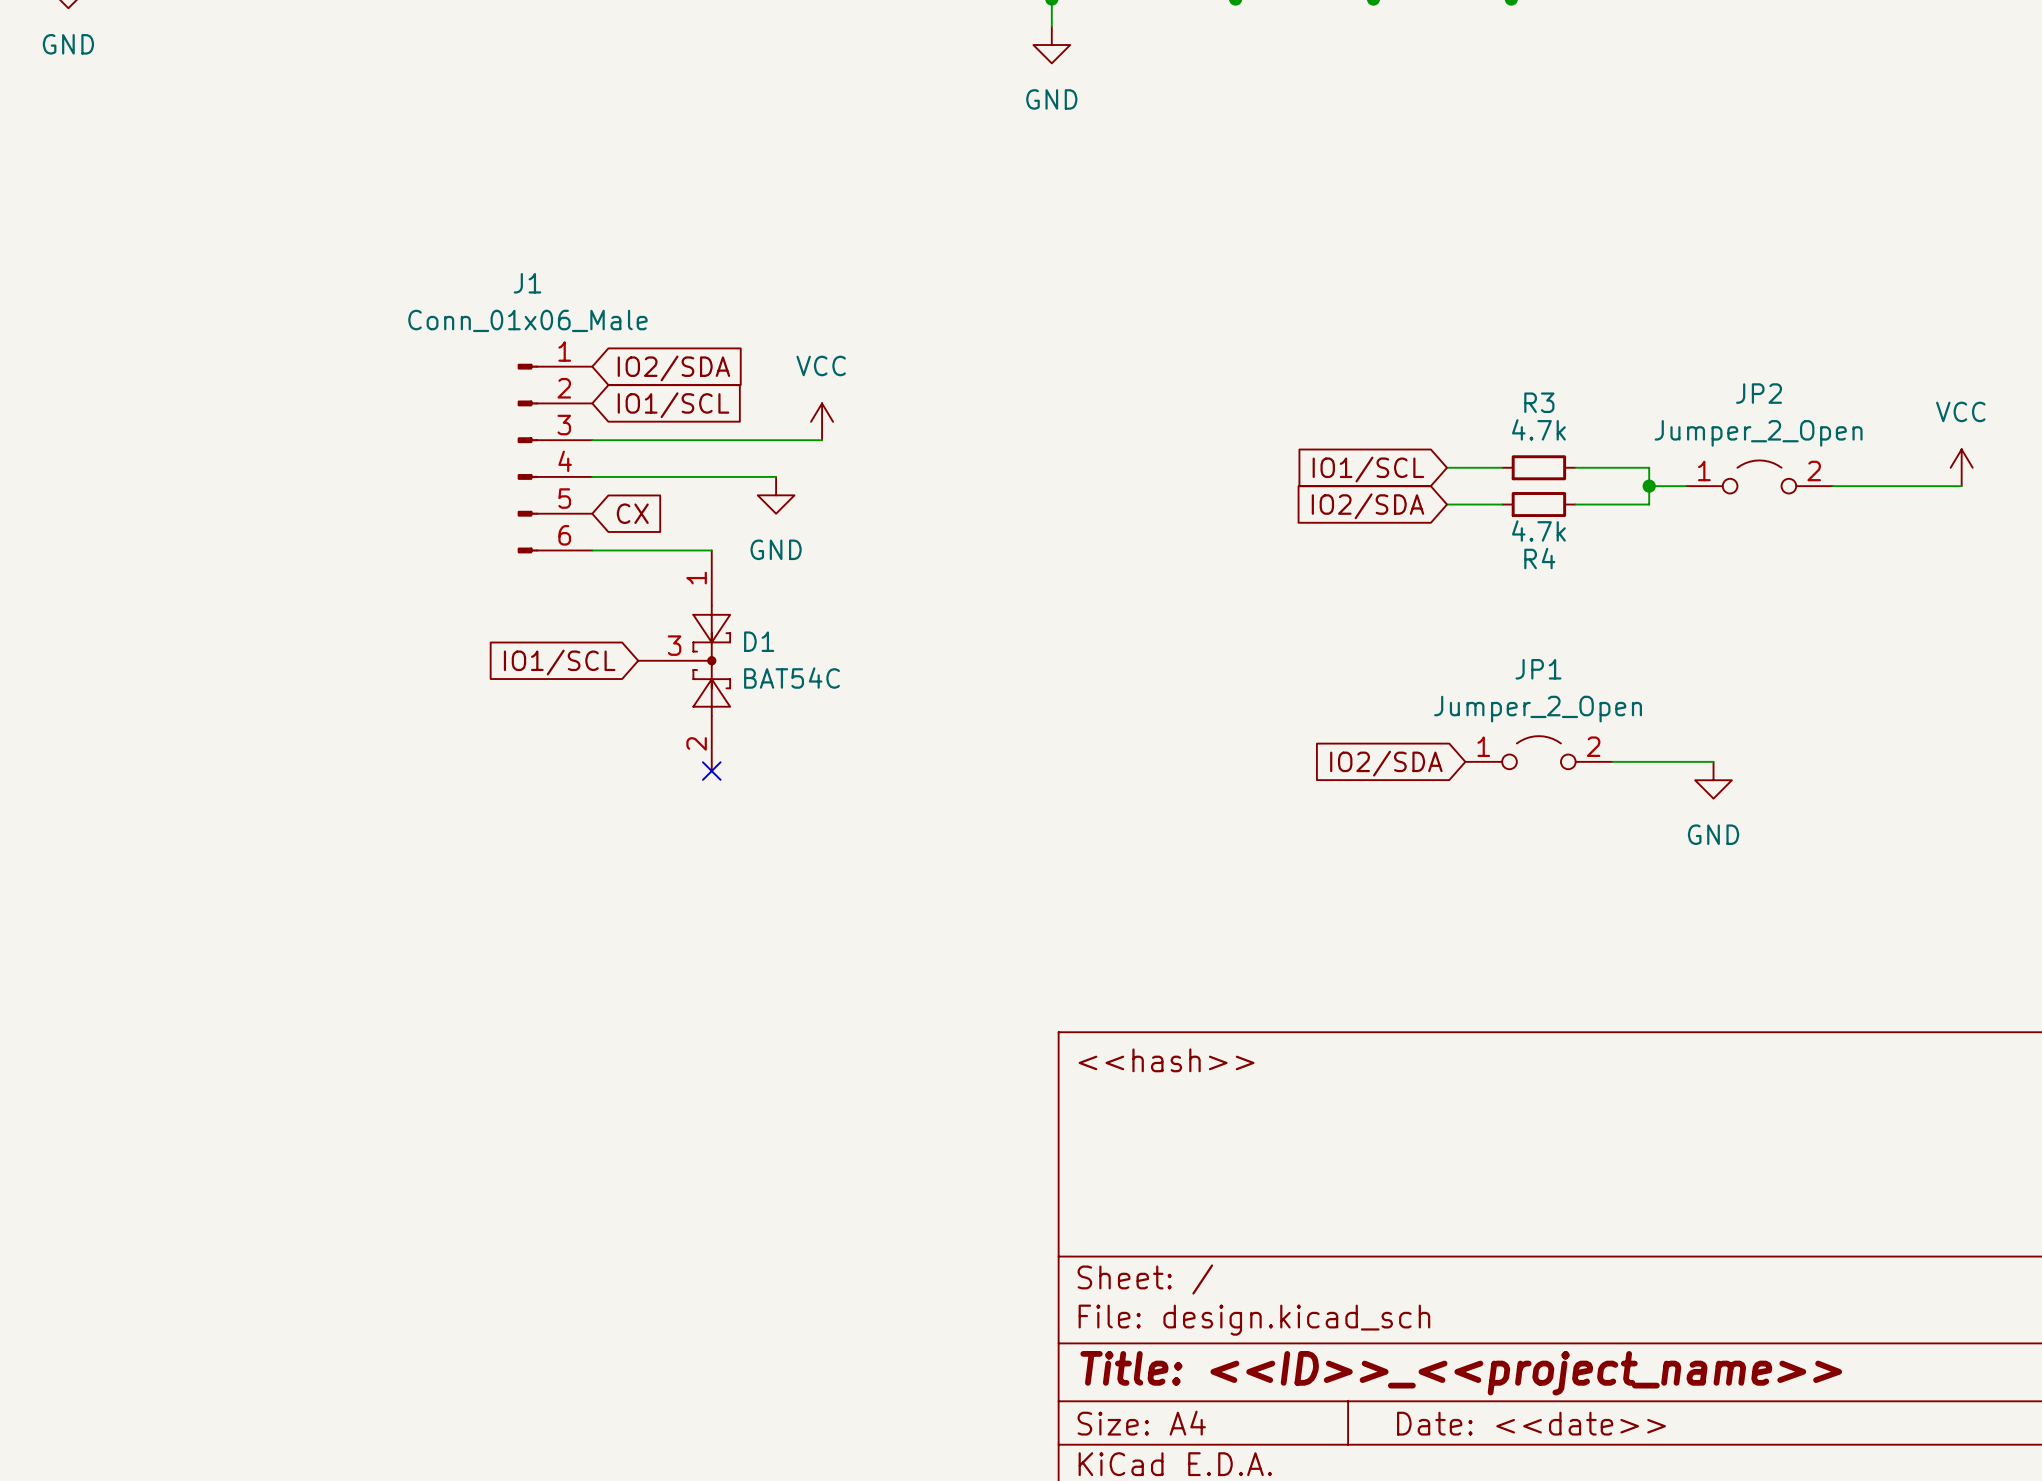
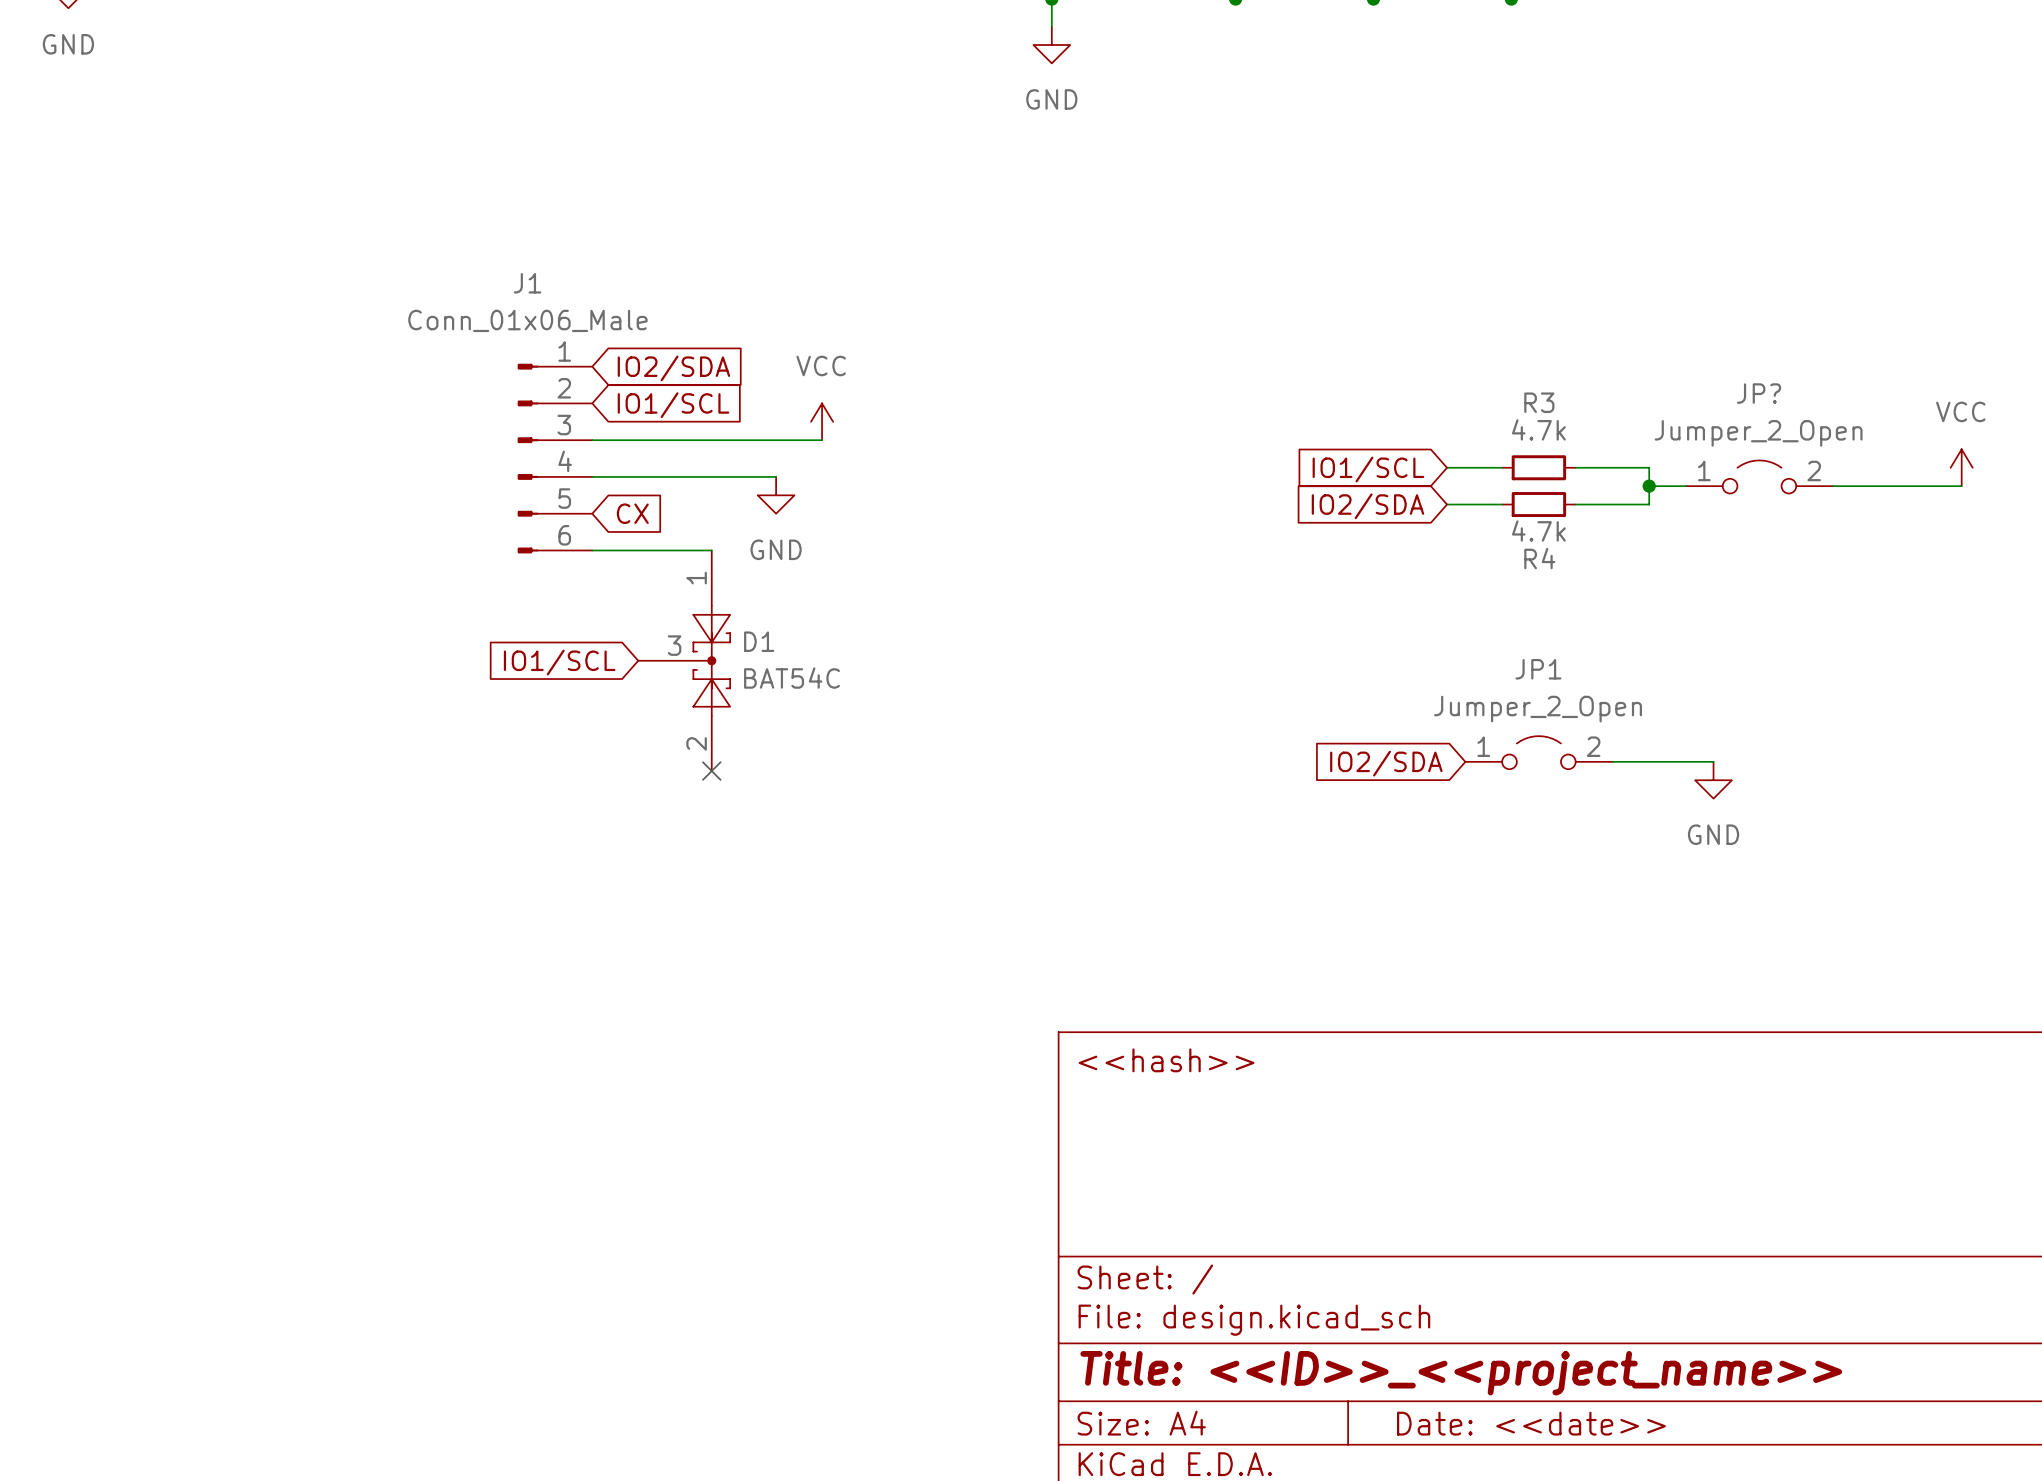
JP2 name: JP2 (1759, 393) -> JP? (1759, 393)

